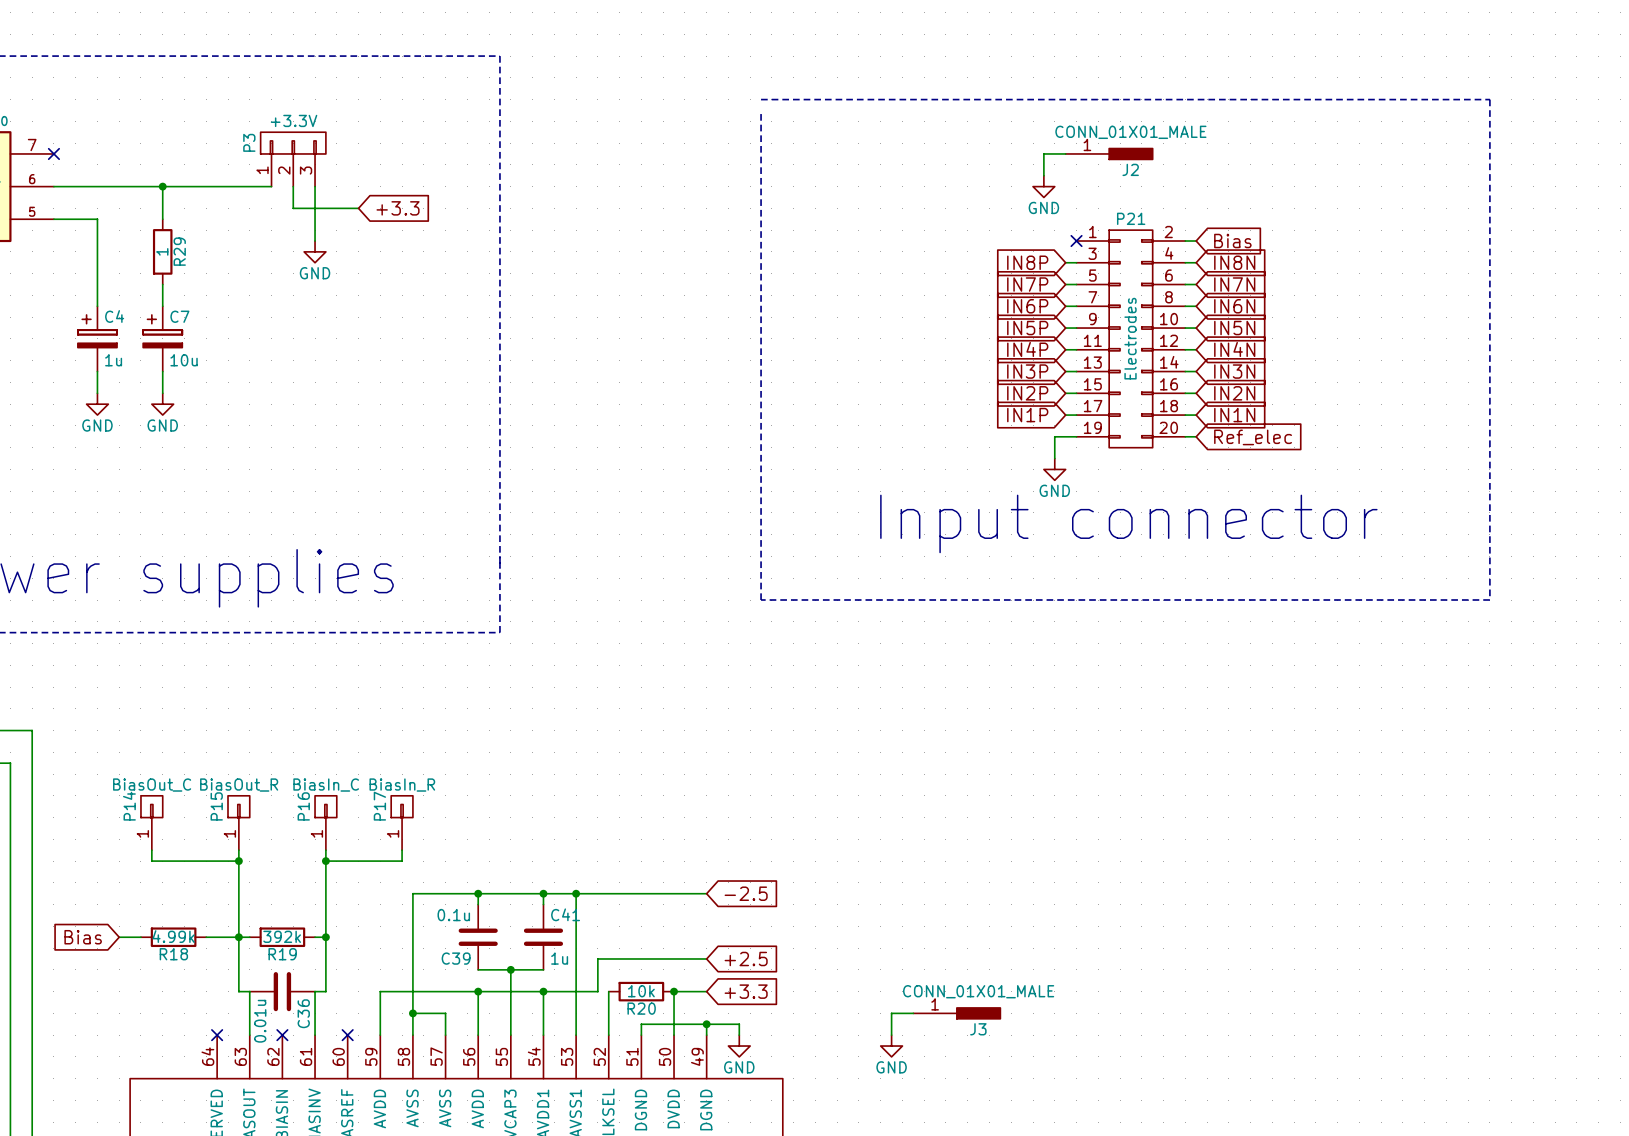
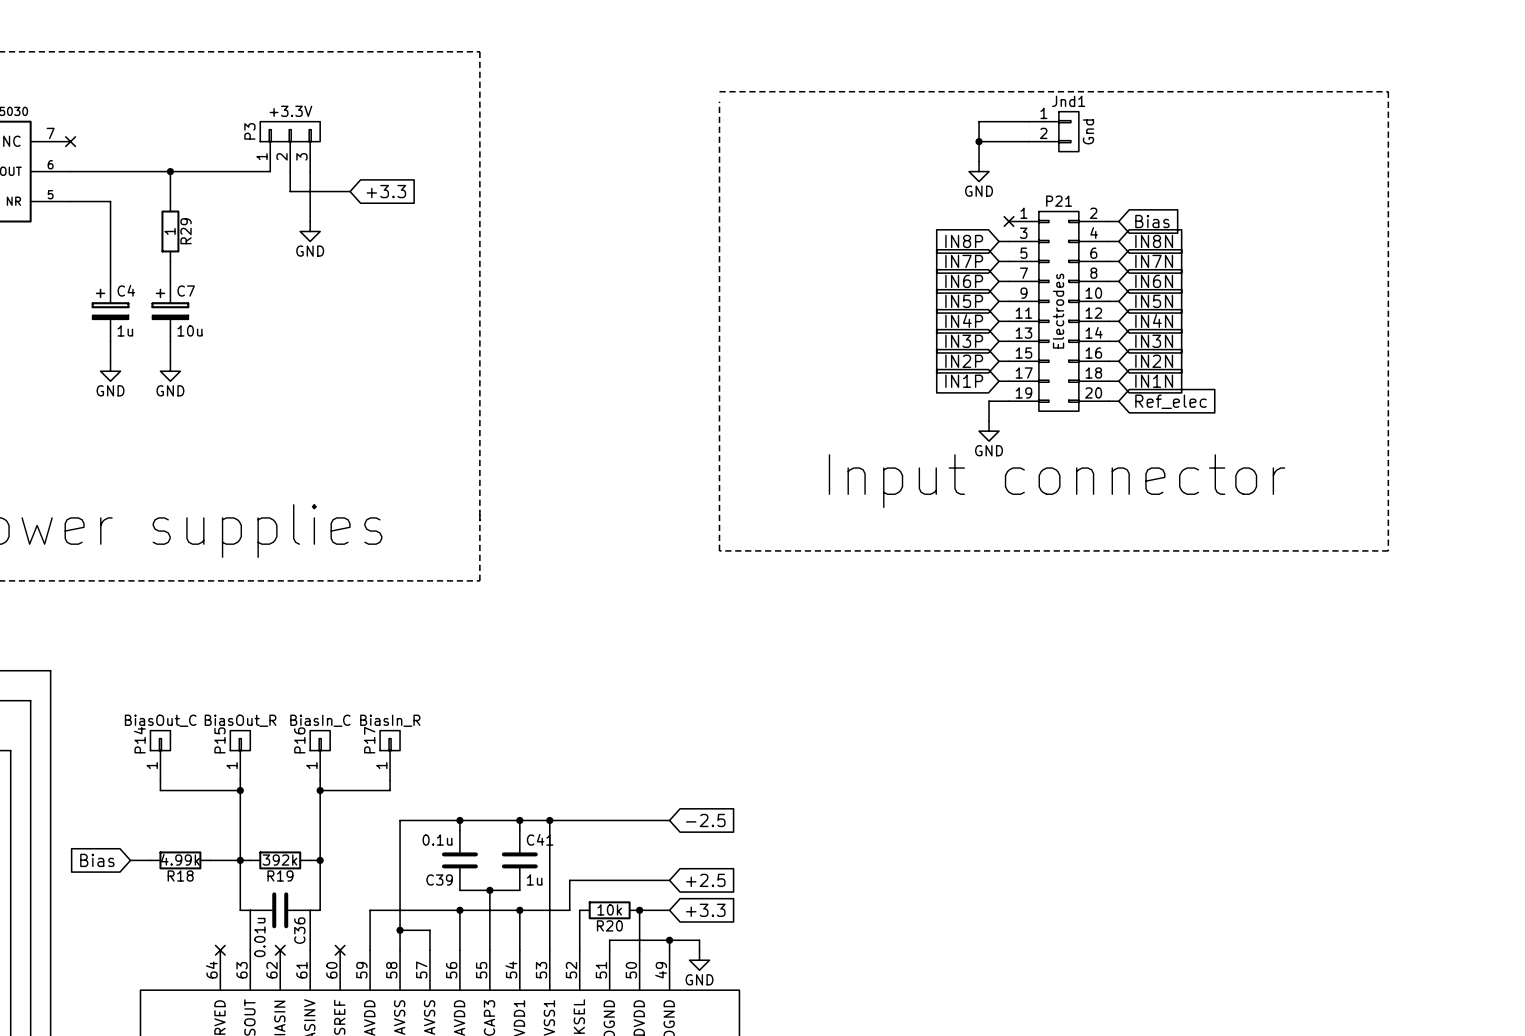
wire: none -> (1028, 121) (979, 121) (979, 141)
Jnd1: none -> Gnd (1053, 131)
junction: none -> (979, 141)
J2: CONN_01X01_MALE (1109, 153) -> none
wire: (913, 1013) (891, 1013) (891, 1035) -> none
J3: CONN_01X01_MALE (956, 1013) -> none
power symbol: GND (891, 1046) -> none

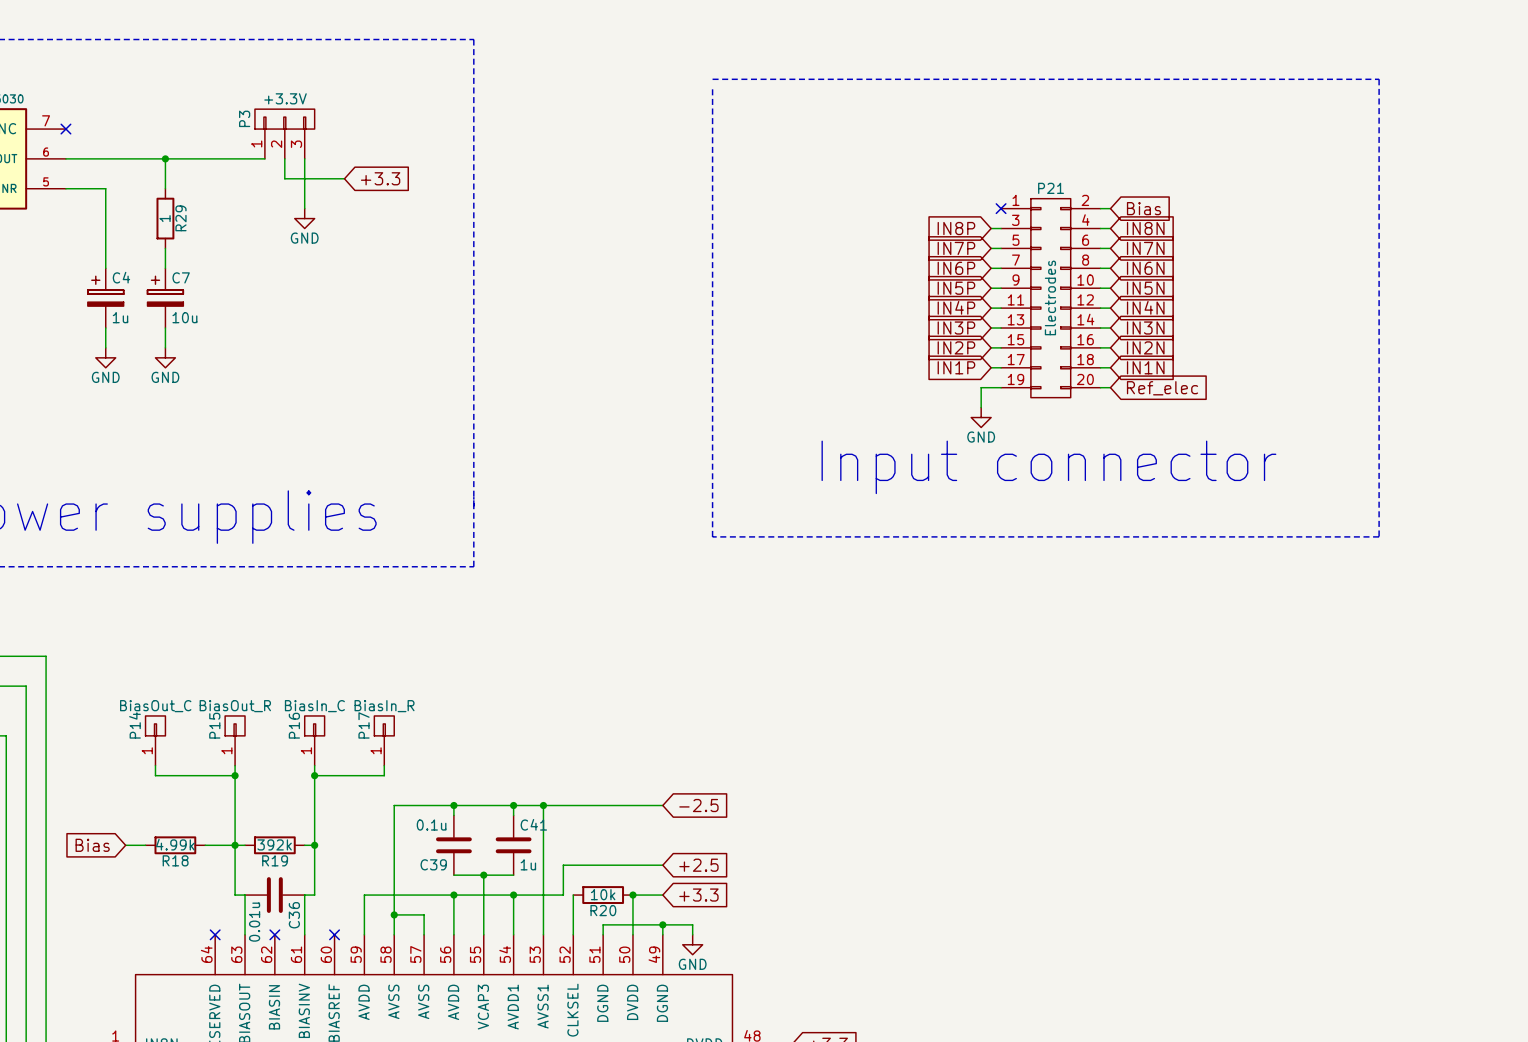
wire: (1028, 121) (979, 121) (979, 161) -> none
Jnd1: Gnd (1053, 131) -> none
wire: (979, 141) (1028, 141) -> none
junction: (979, 141) -> none
power symbol: GND (979, 171) -> none

